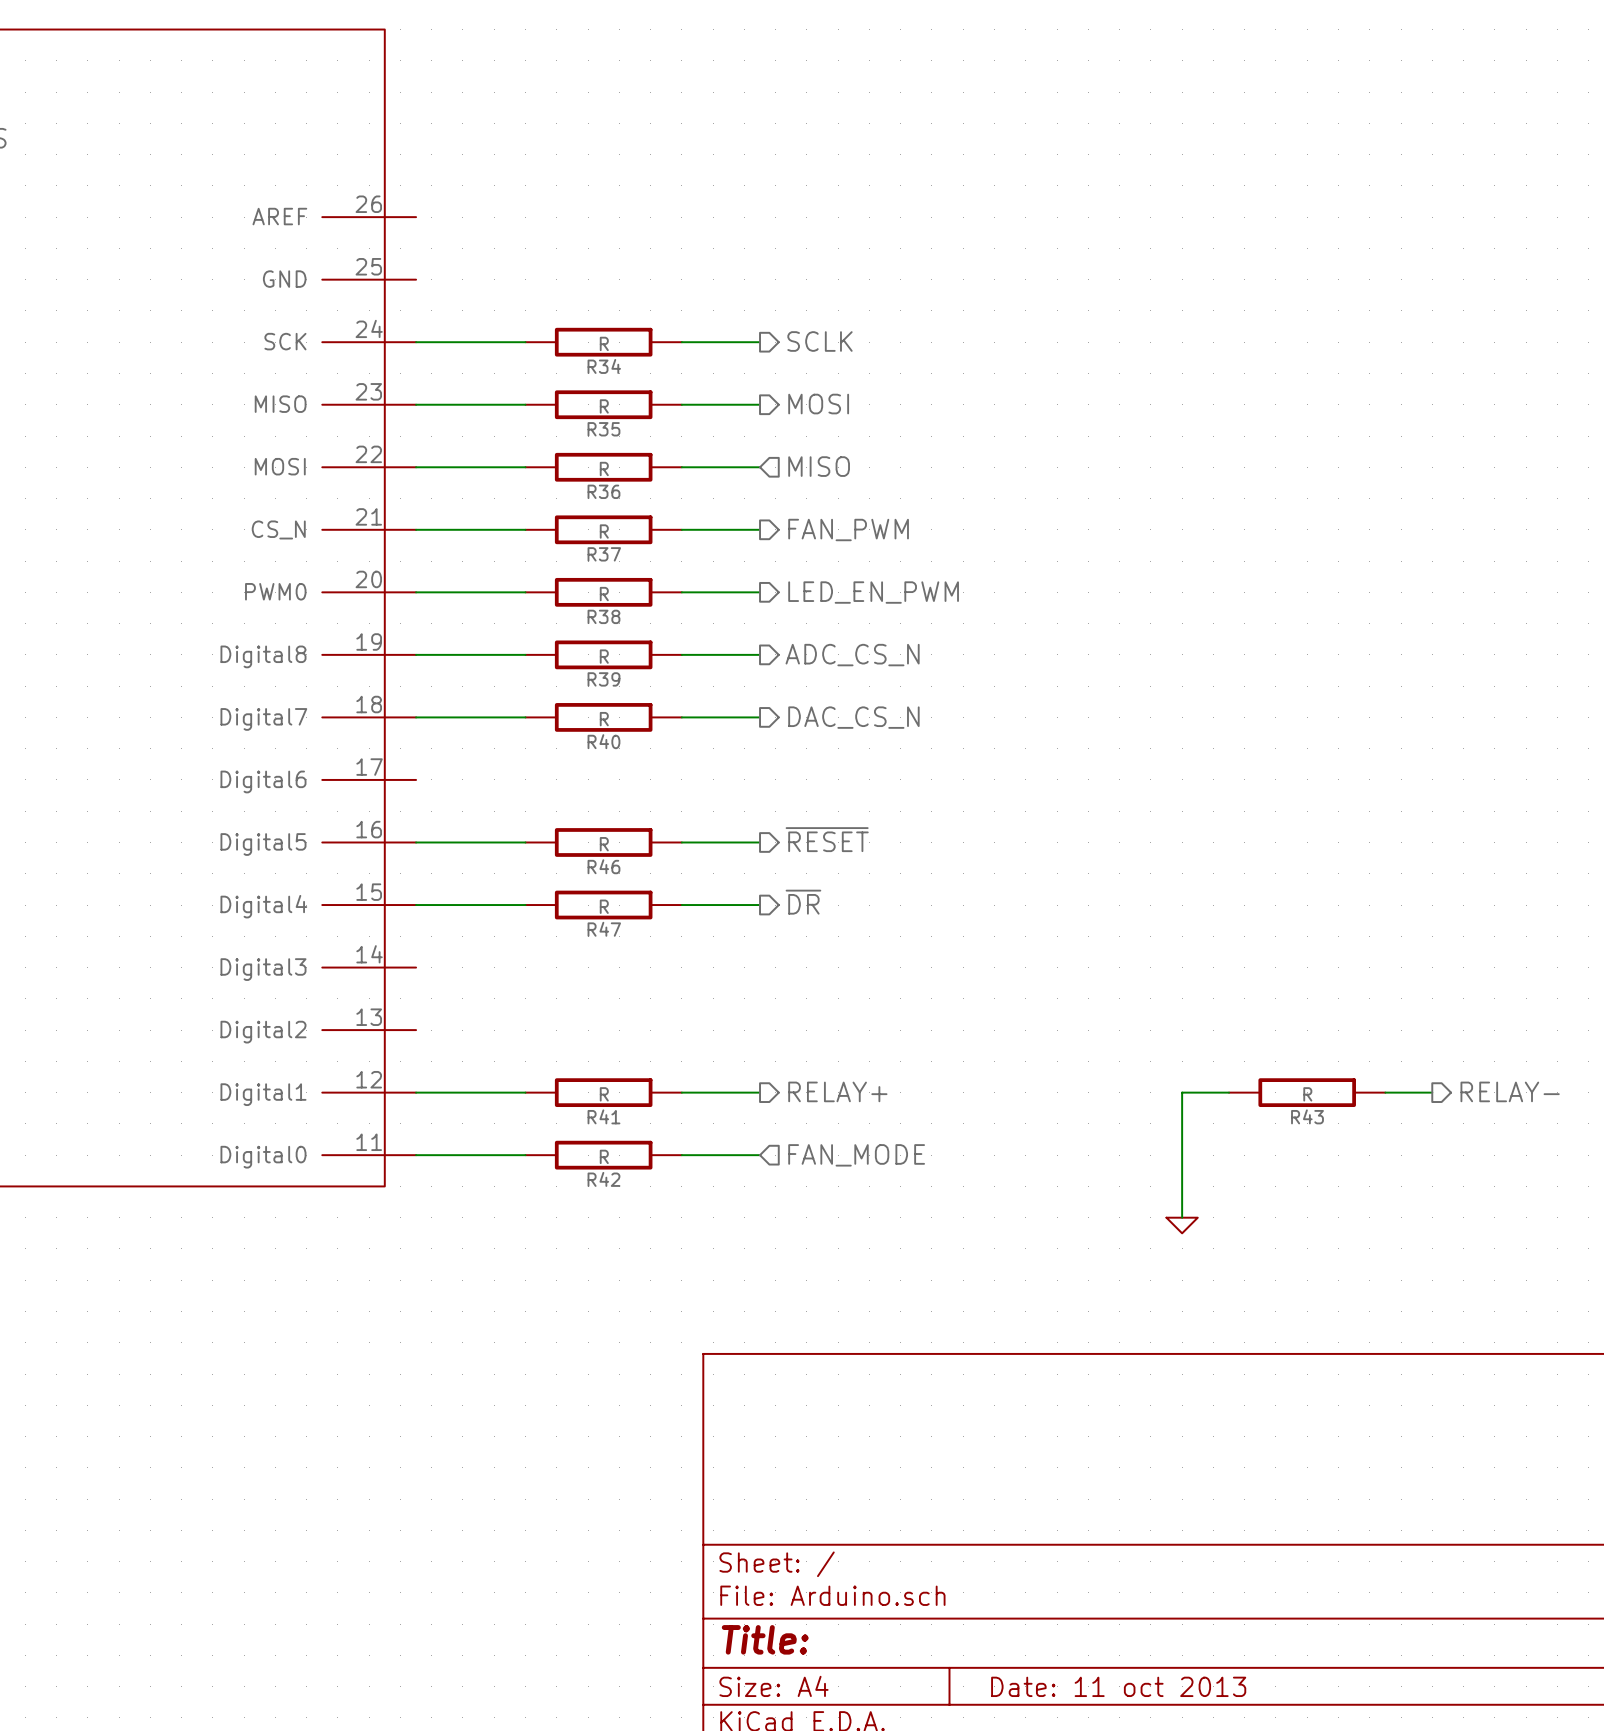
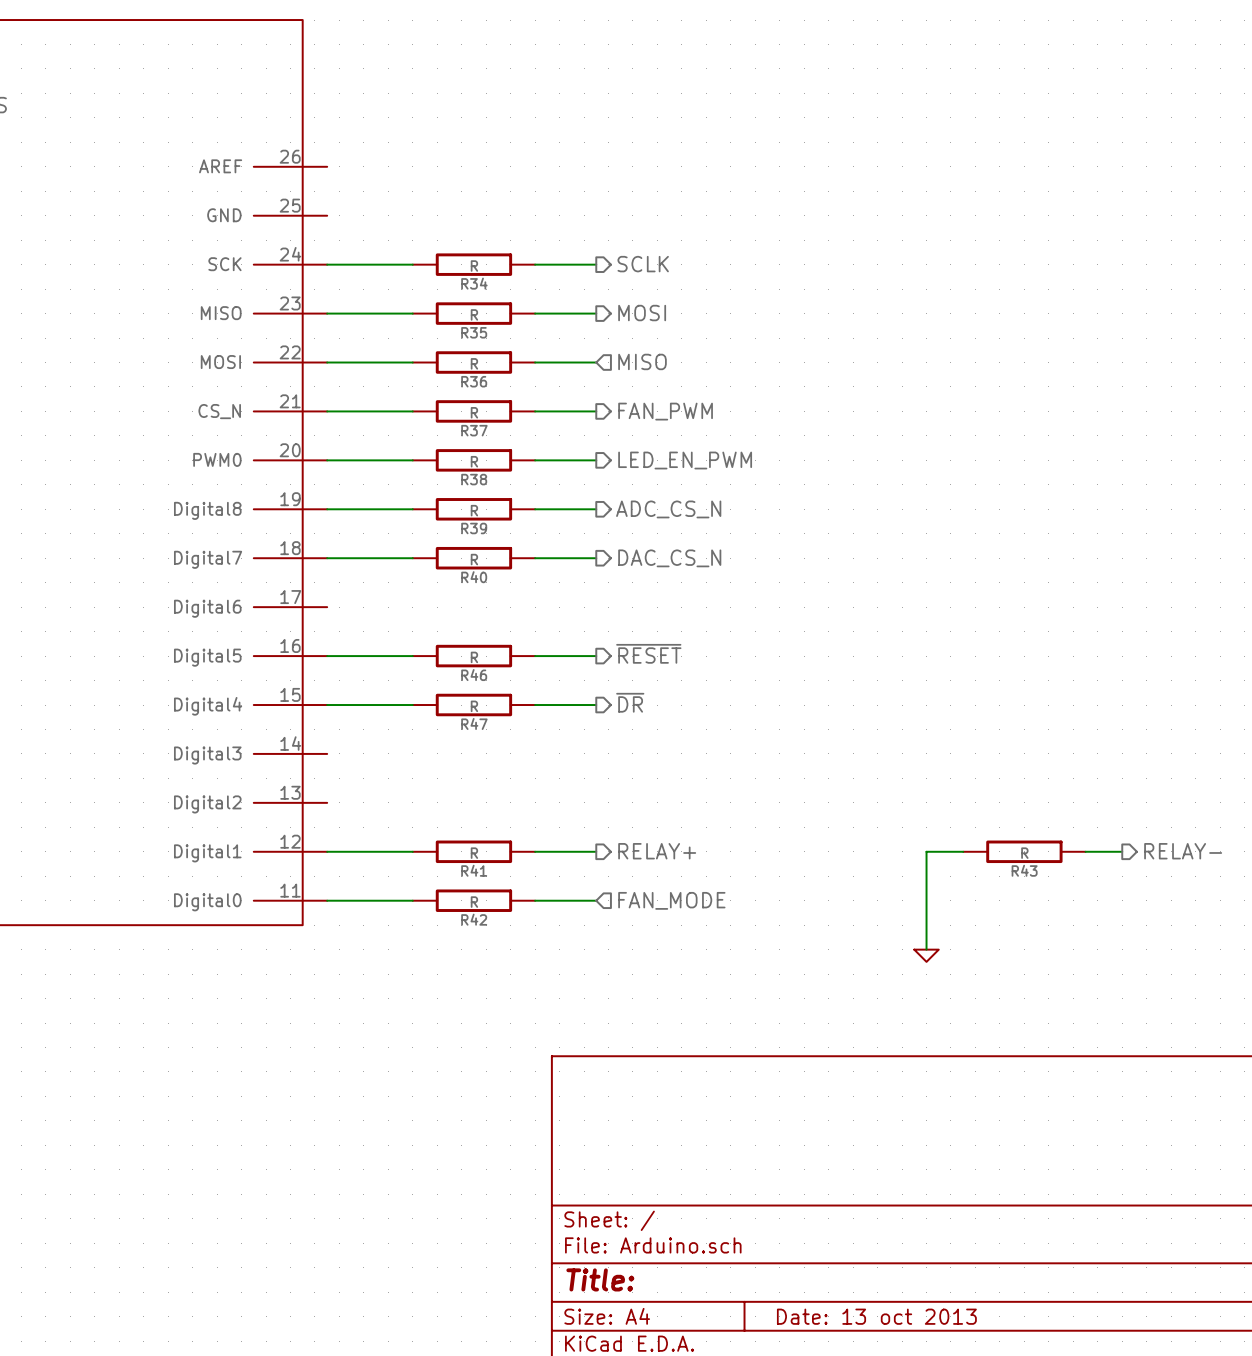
title block: Date: 11 oct 2013 (1118, 1686) -> Date: 13 oct 2013 (876, 1316)

